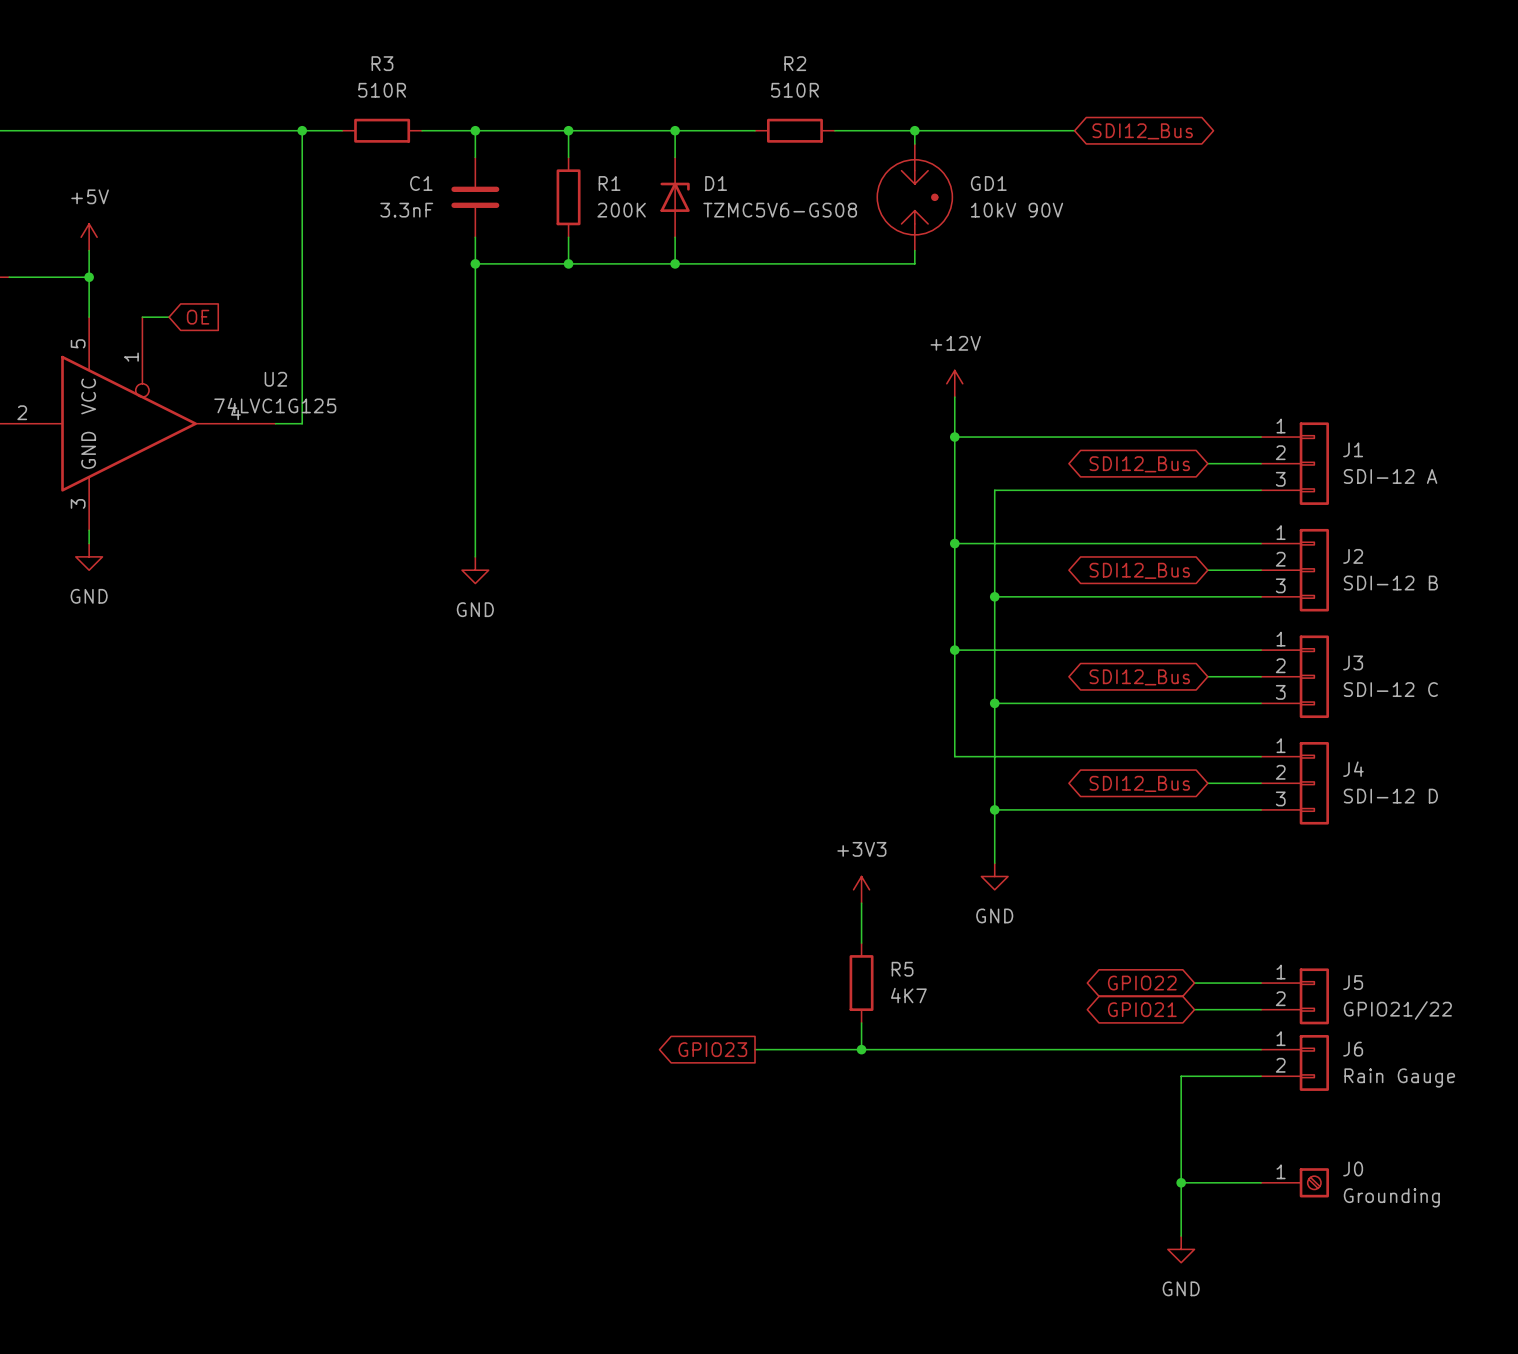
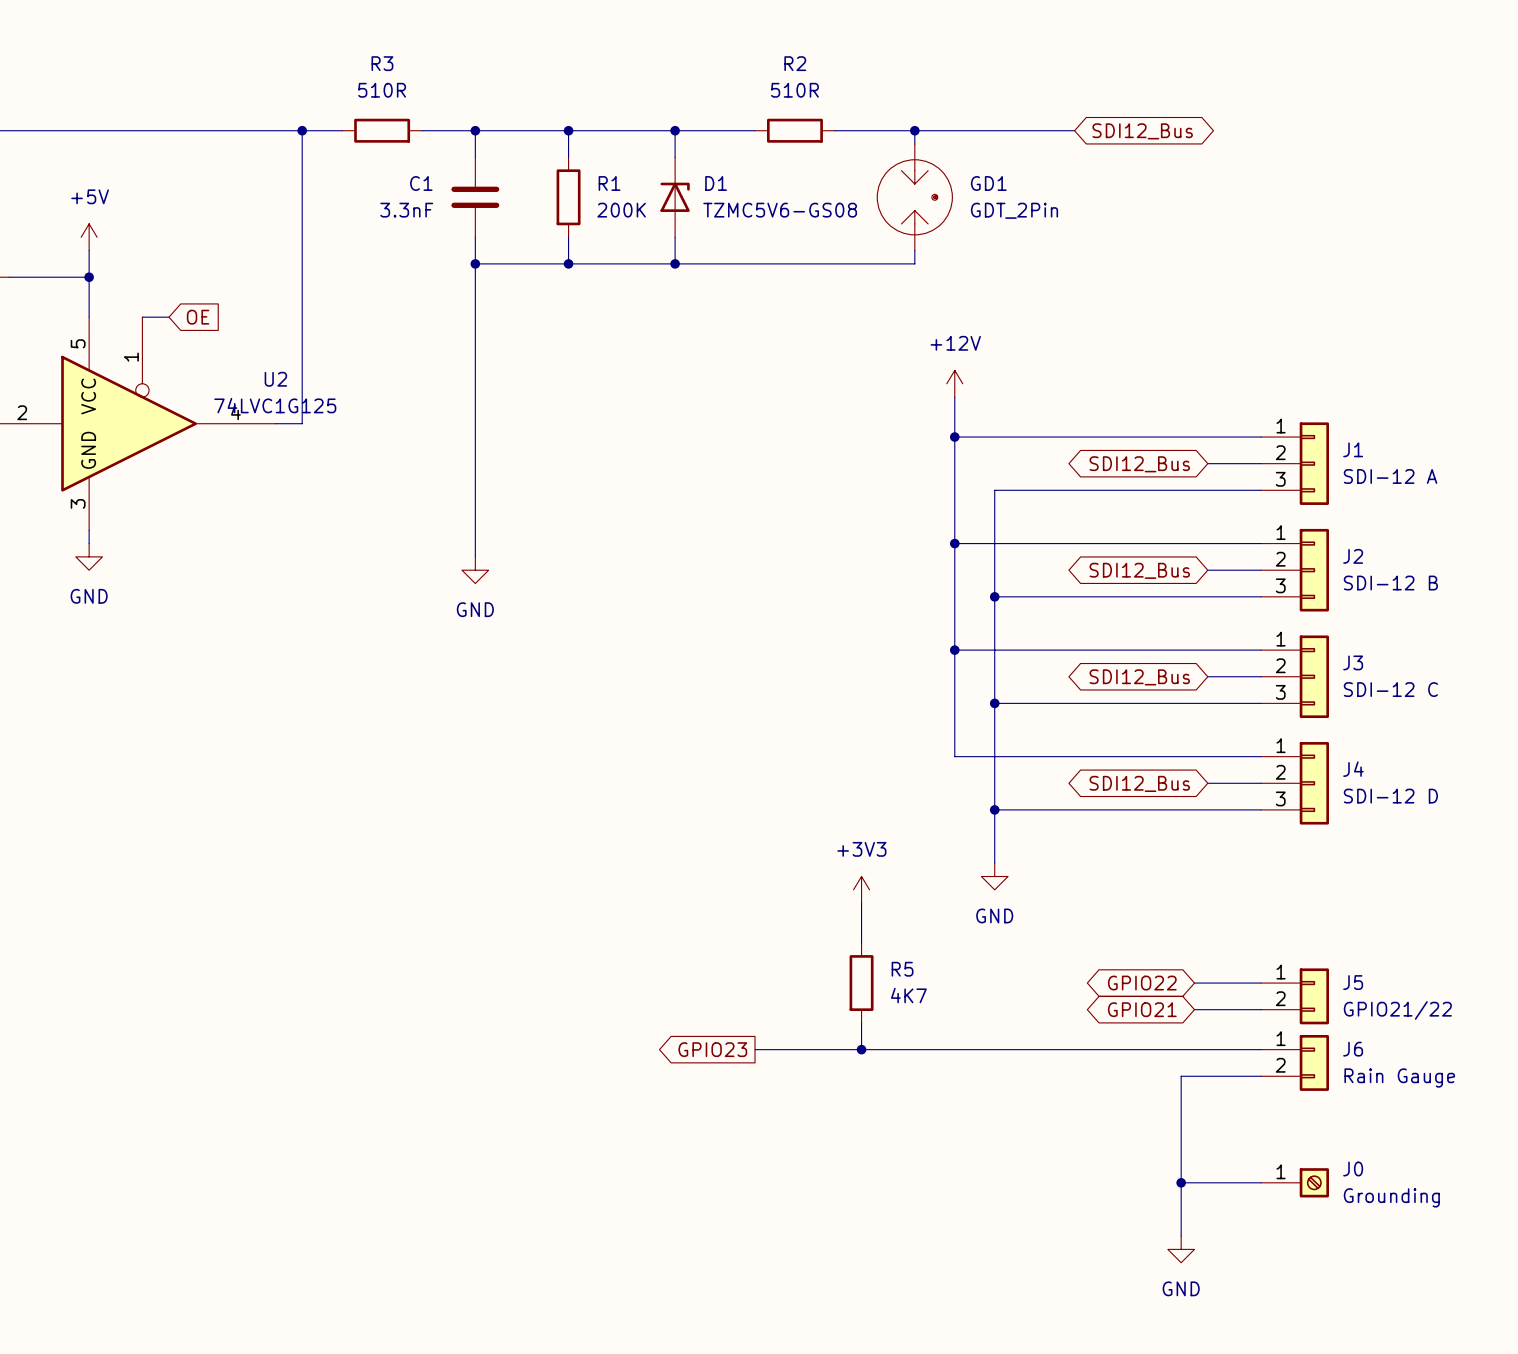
GD1 value: 10kV 90V (1017, 210) -> GDT_2Pin (1014, 210)

